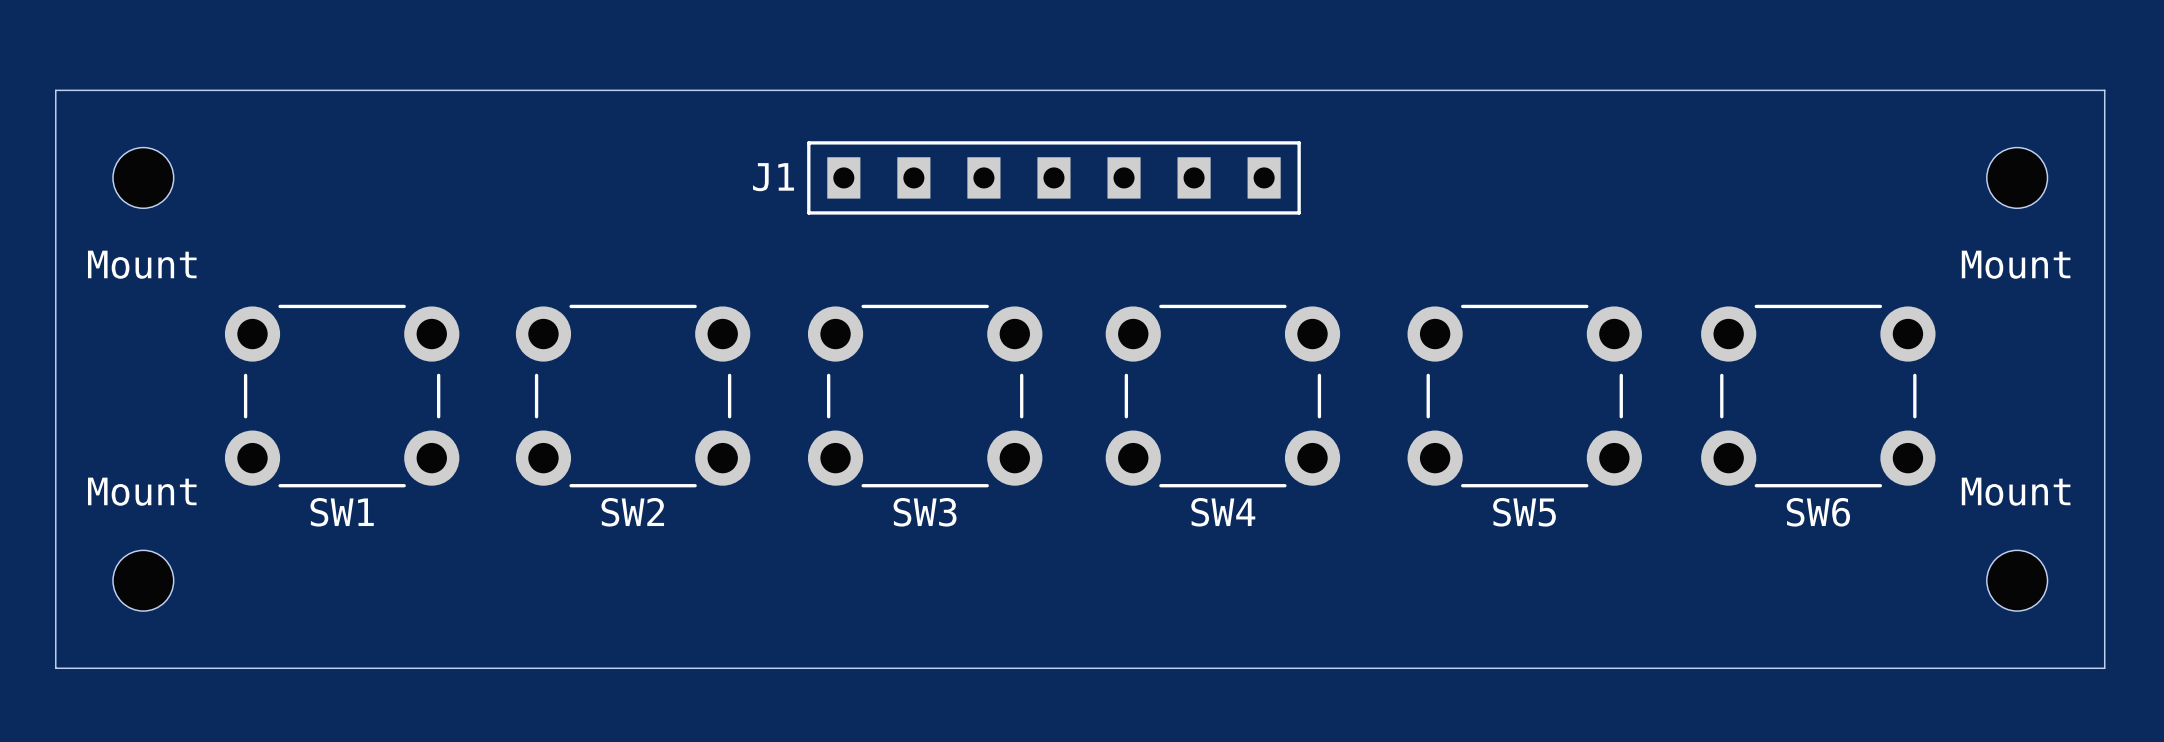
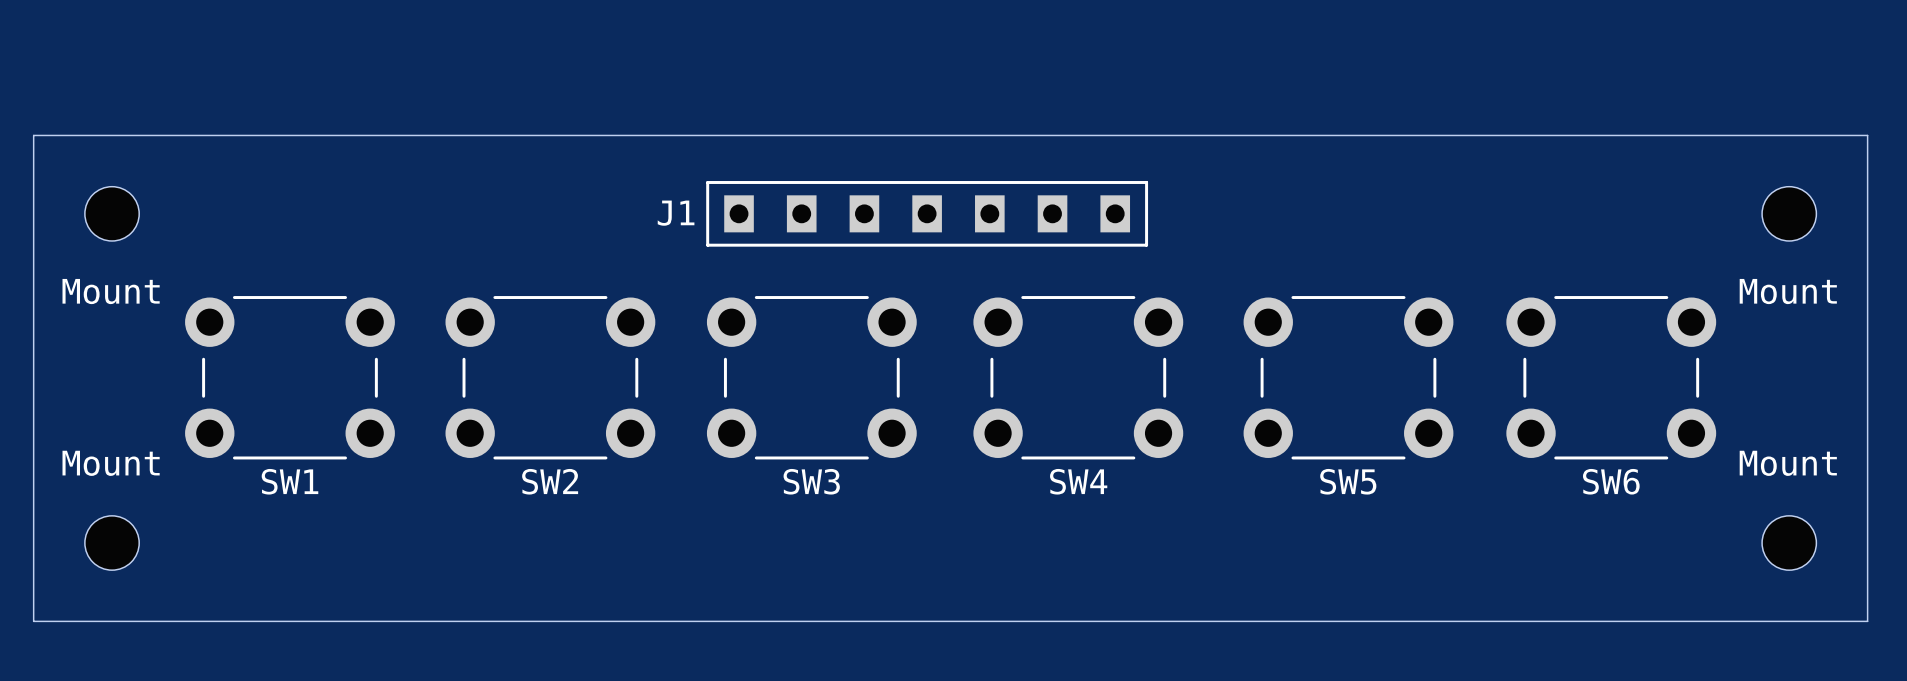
board edge: (55, 125) (55, 90) (2104, 90) (2104, 125) -> (33, 135) (1867, 135)
Mount position: (143, 177) -> (112, 213)
J1 position: (1053, 177) -> (927, 213)
Mount position: (2017, 177) -> (1789, 213)

